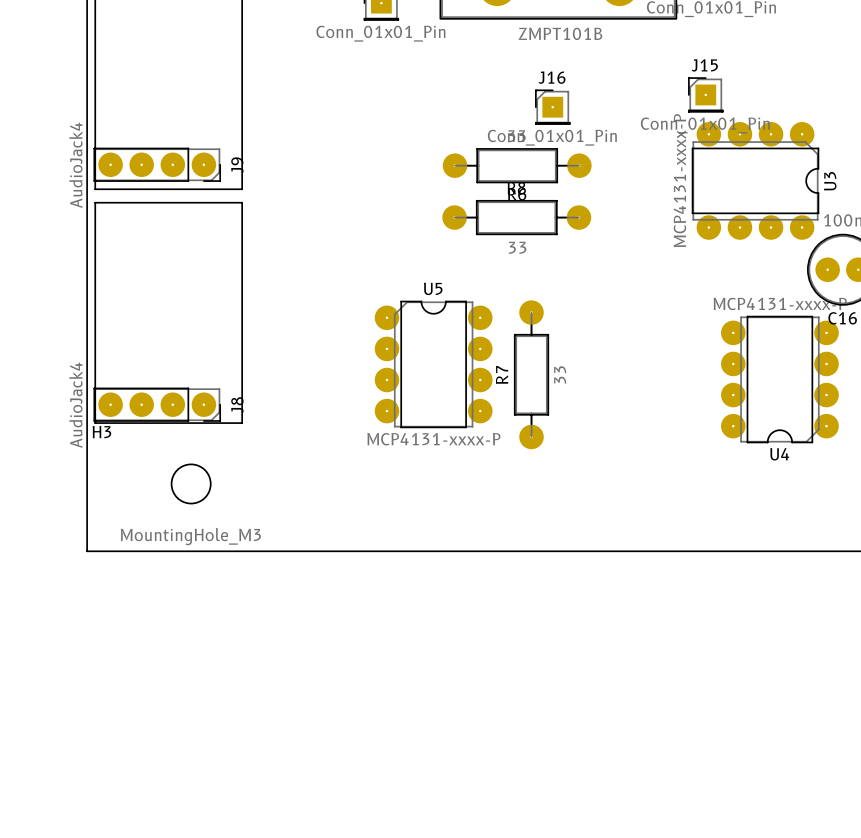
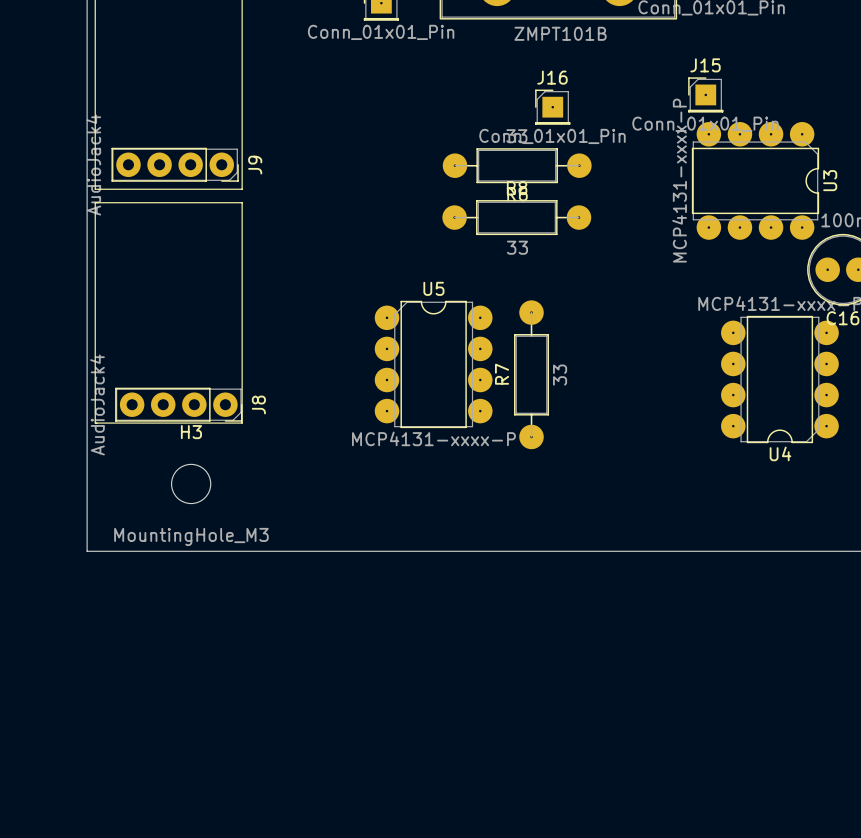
J9 footprint: [93, 147, 221, 182] -> [111, 147, 239, 182]
J8 footprint: [93, 387, 221, 422] -> [115, 387, 243, 422]
H3 name position: H3 (101, 432) -> H3 (191, 432)

